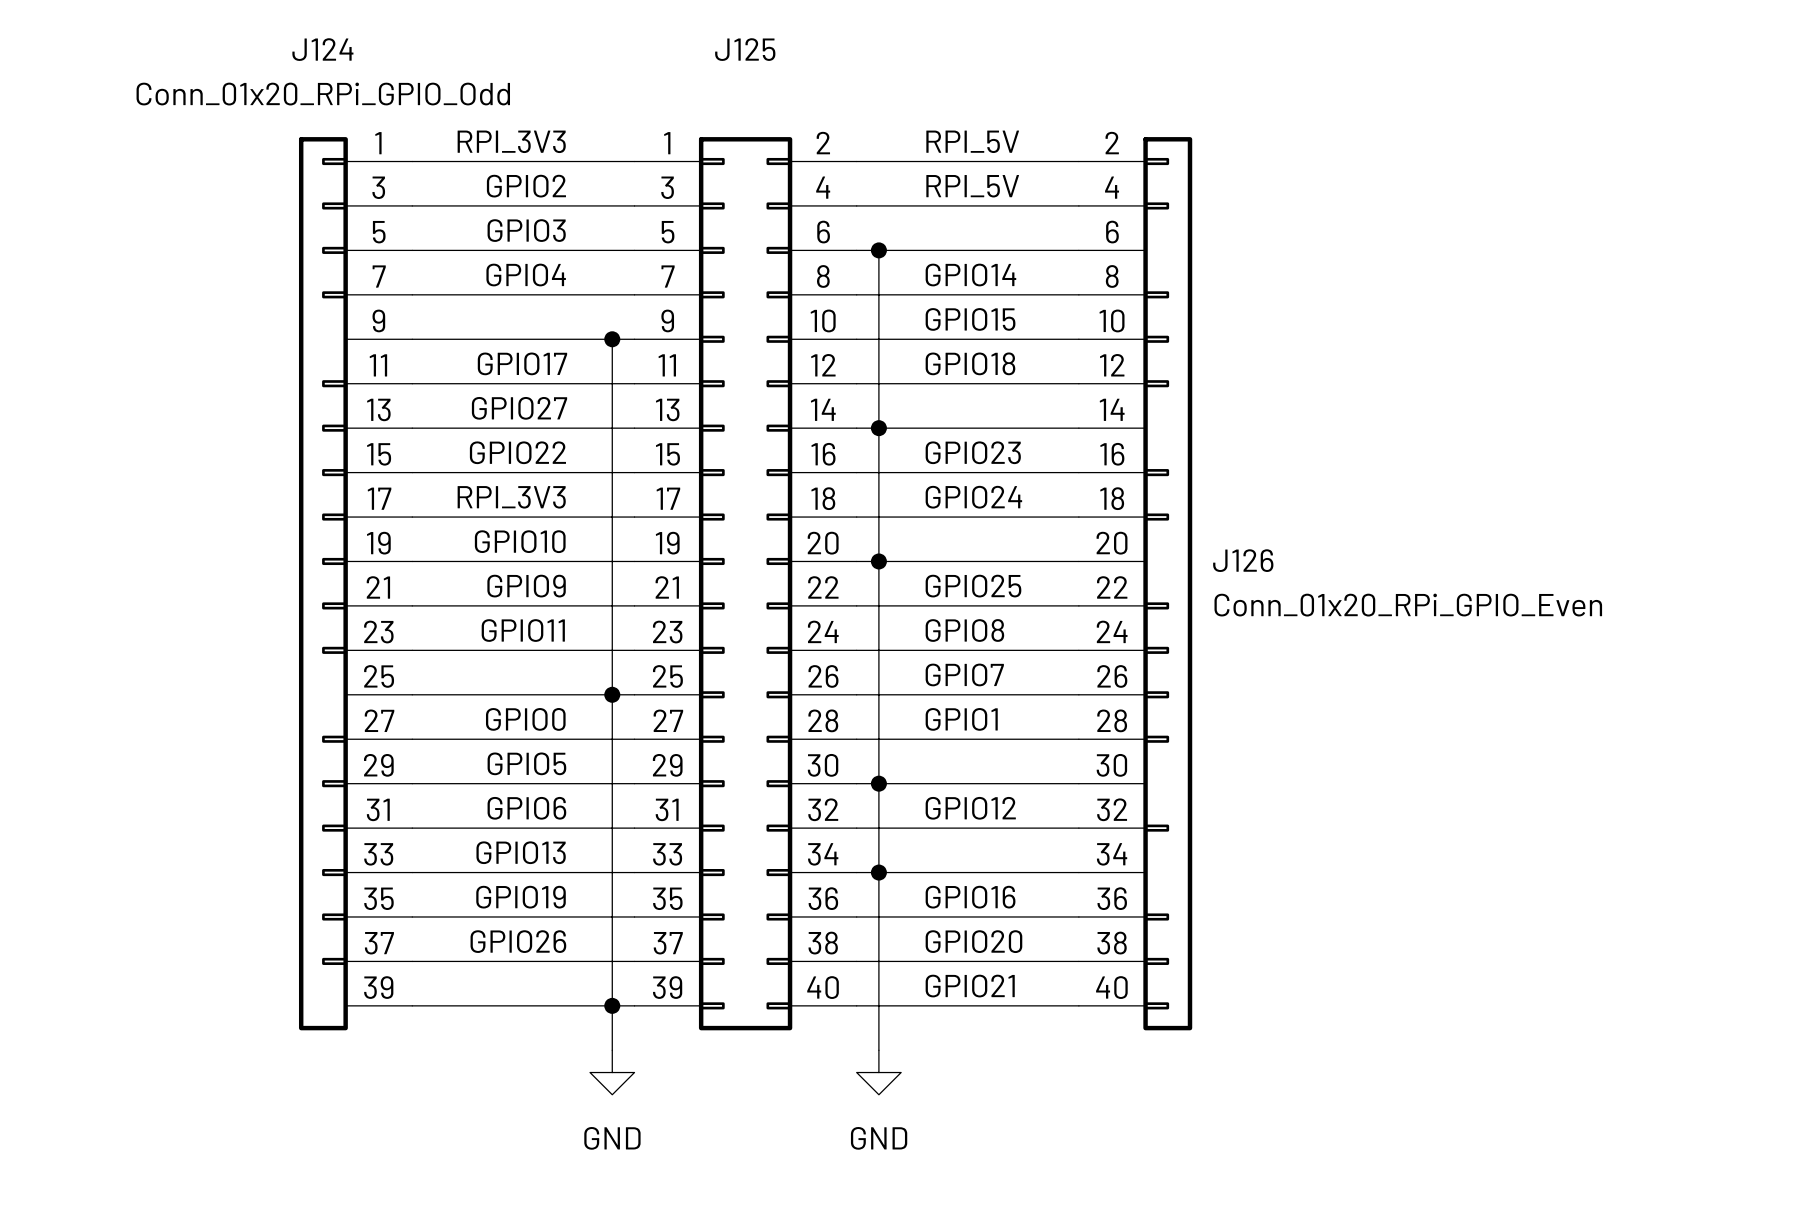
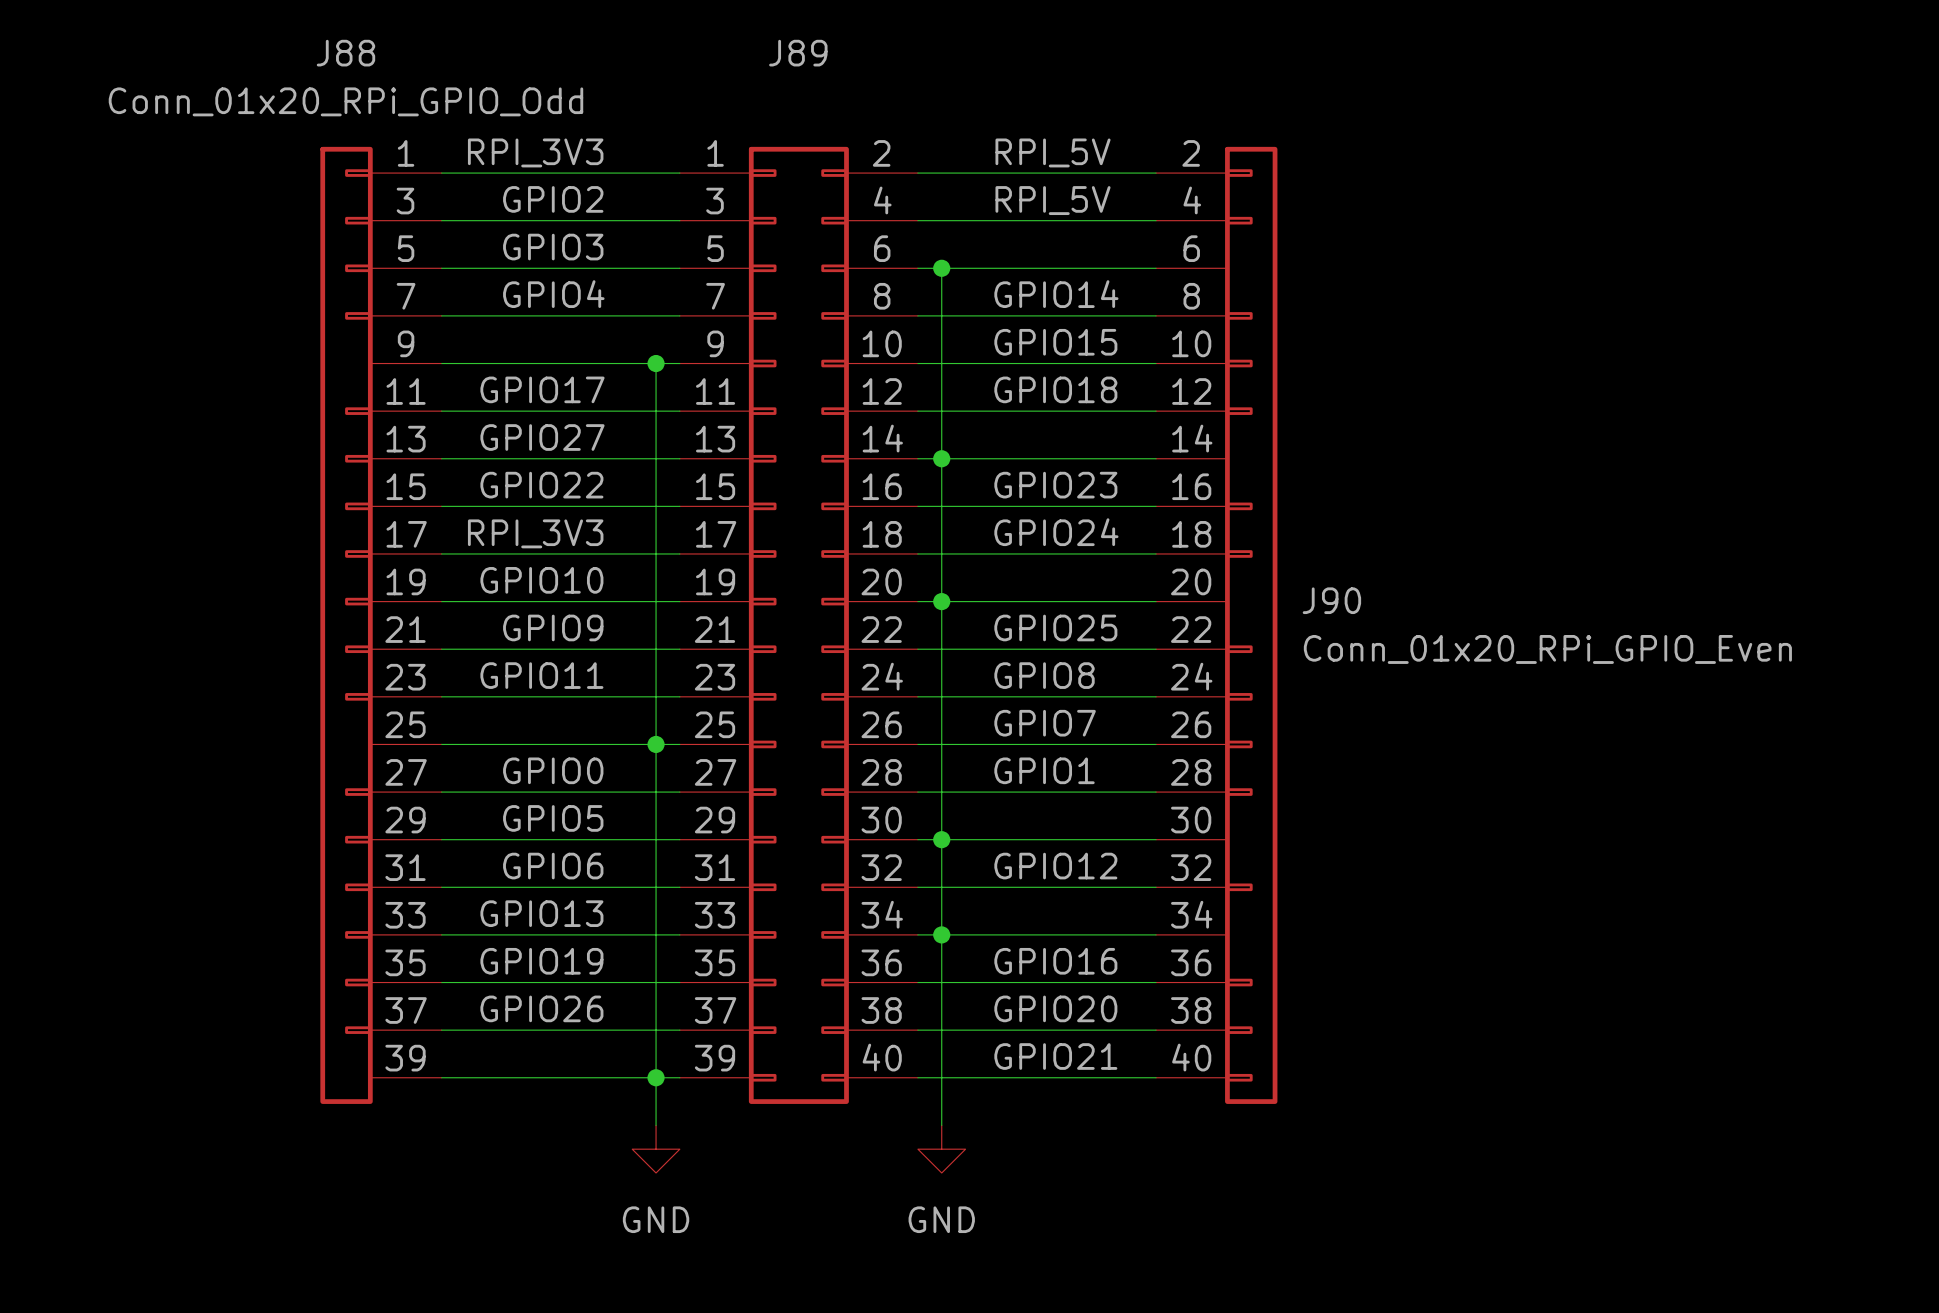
J124 name: J124 (322, 49) -> J88 (345, 53)
J125 name: J125 (745, 49) -> J89 (798, 53)
J126 name: J126 (1243, 560) -> J90 (1331, 600)

